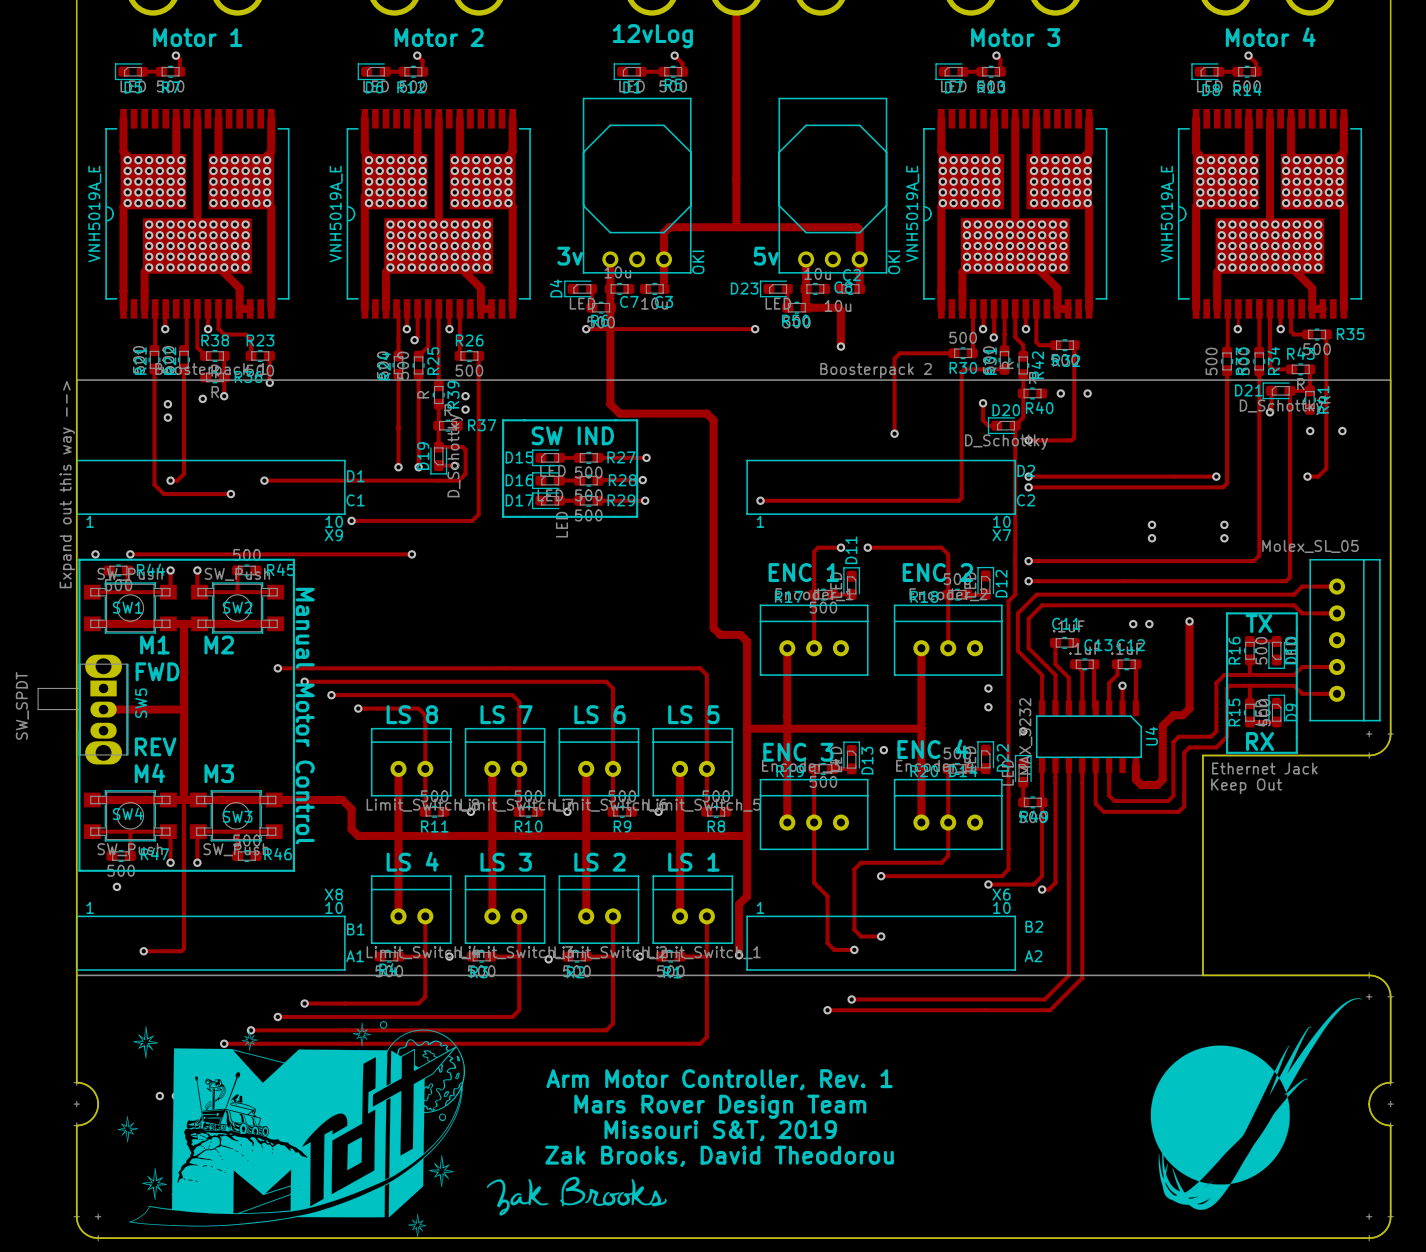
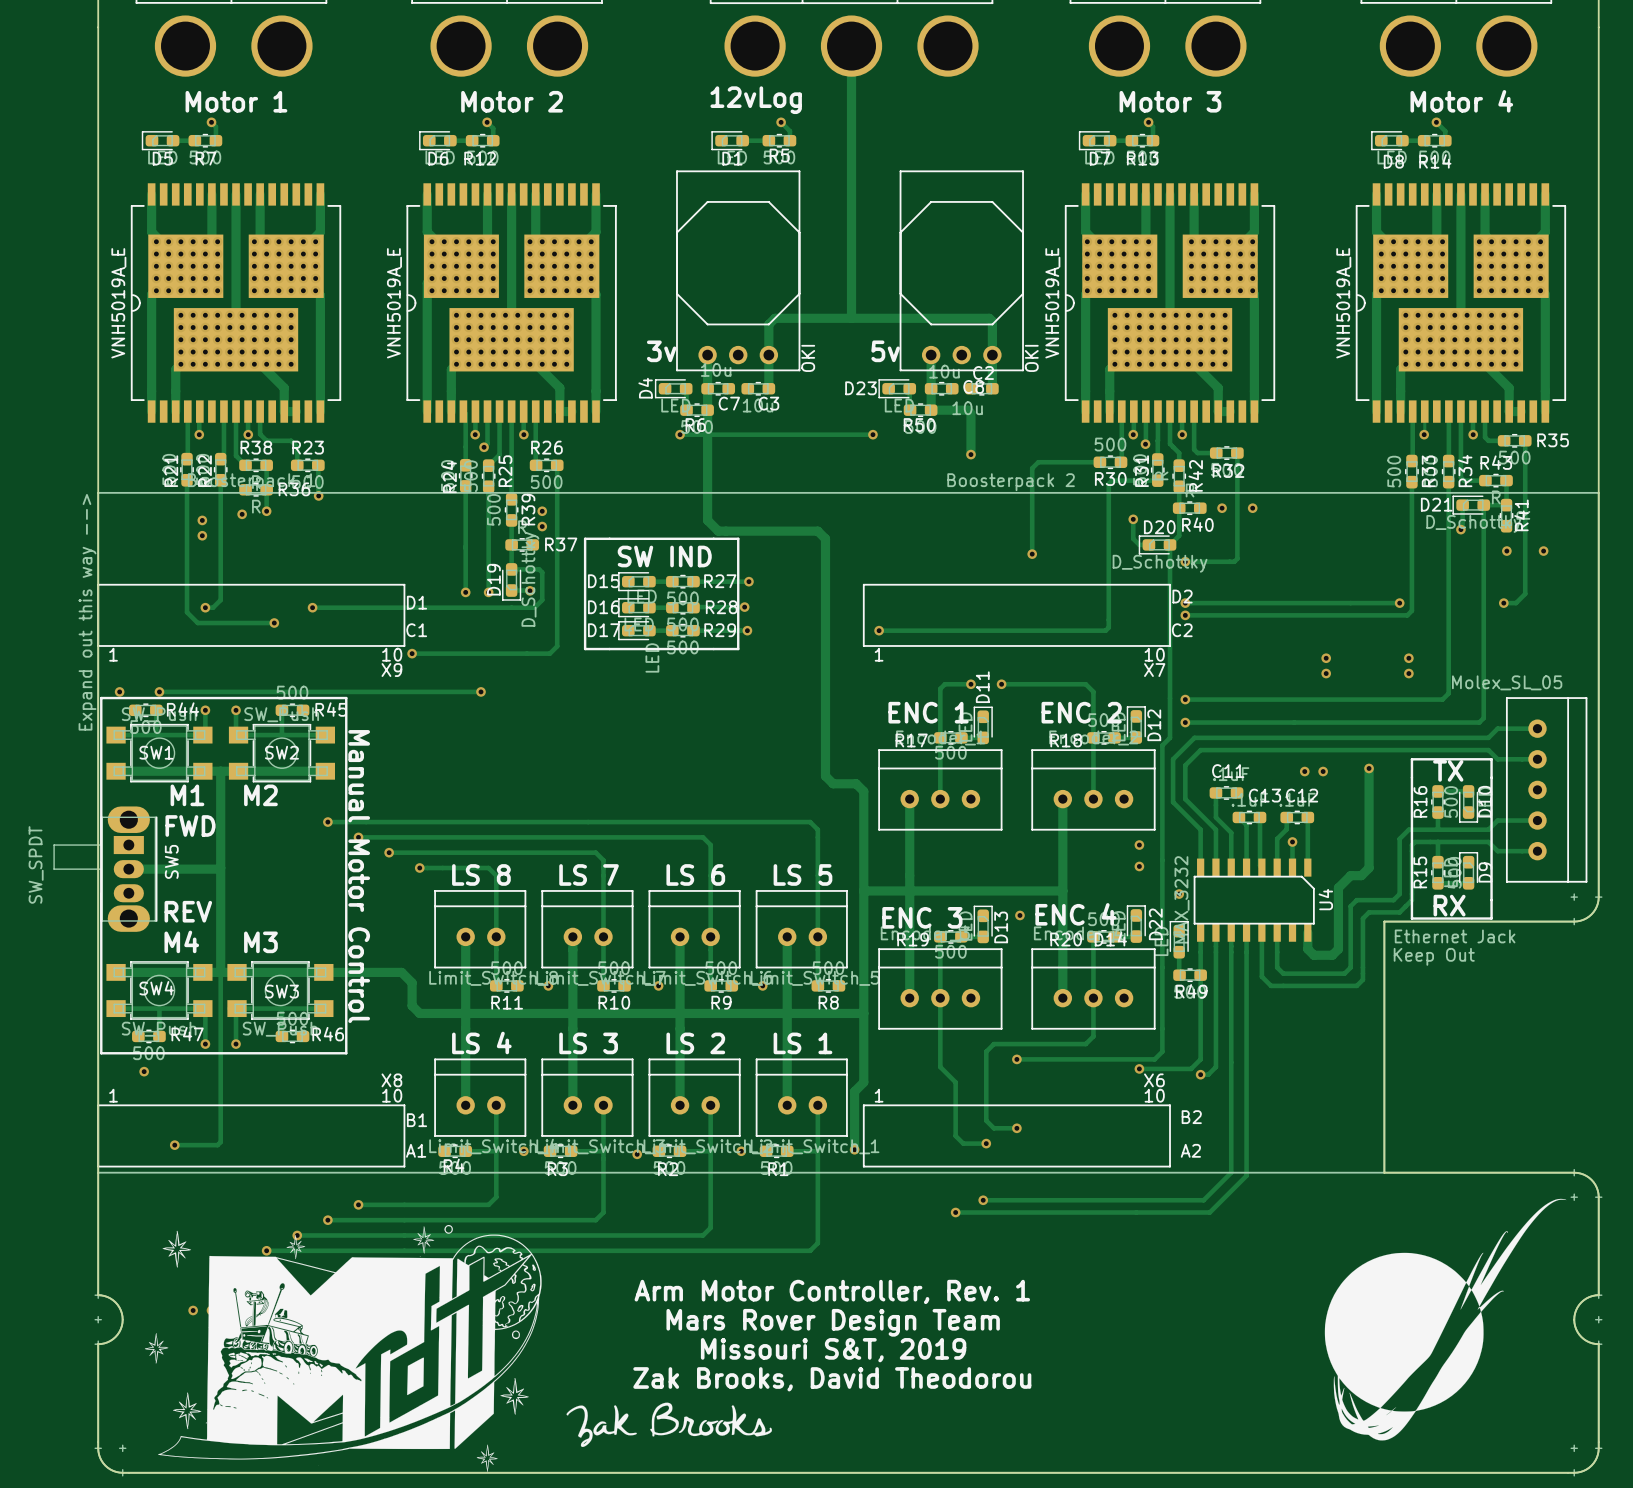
R39 value: R (423, 394) -> 500 (493, 509)

